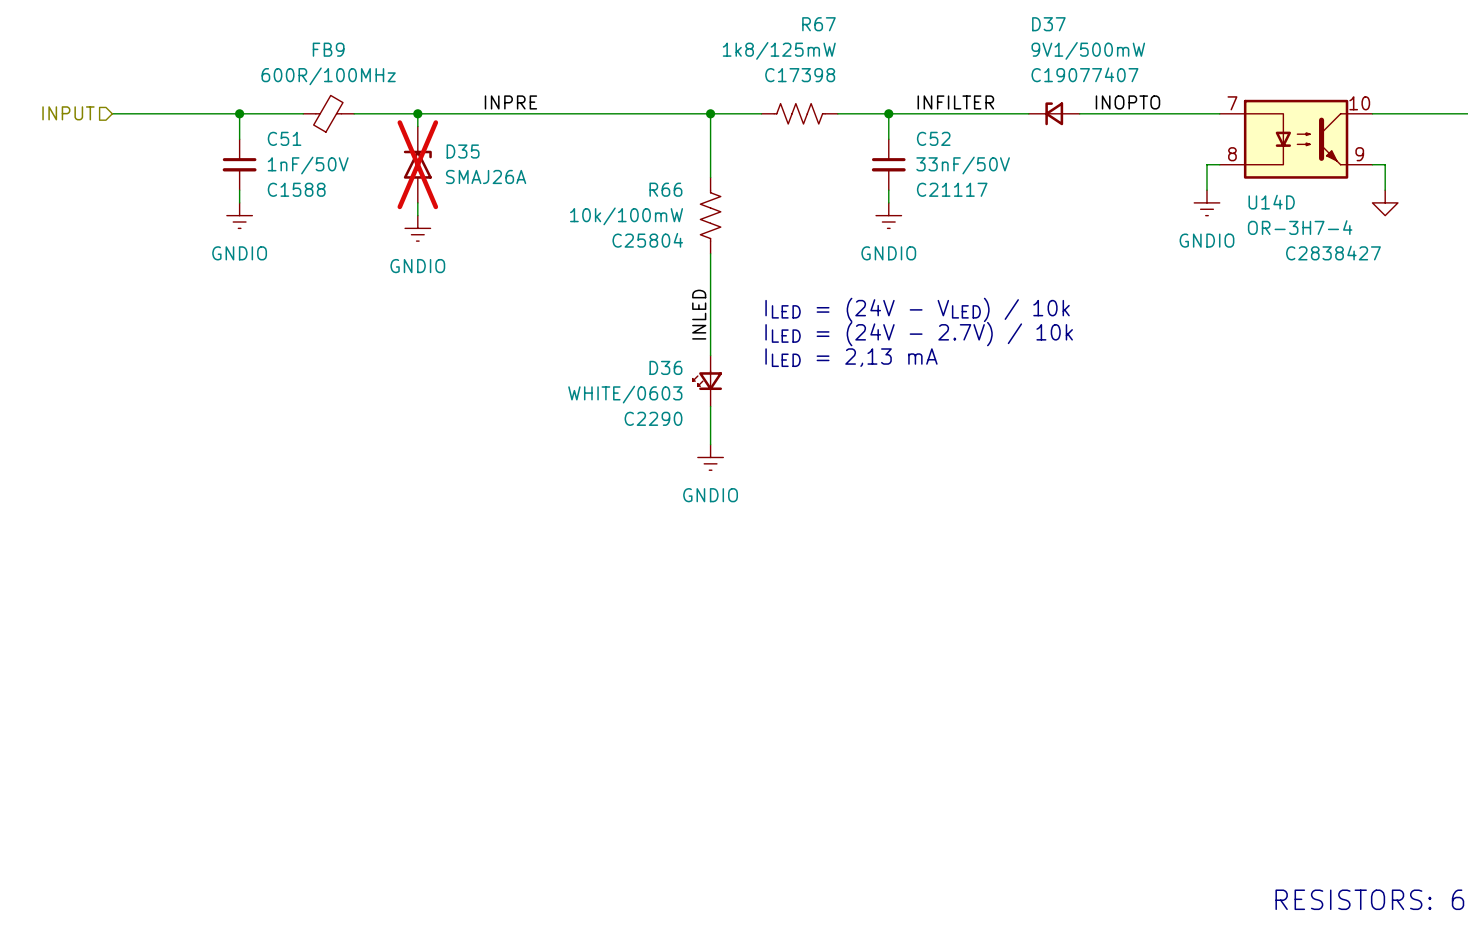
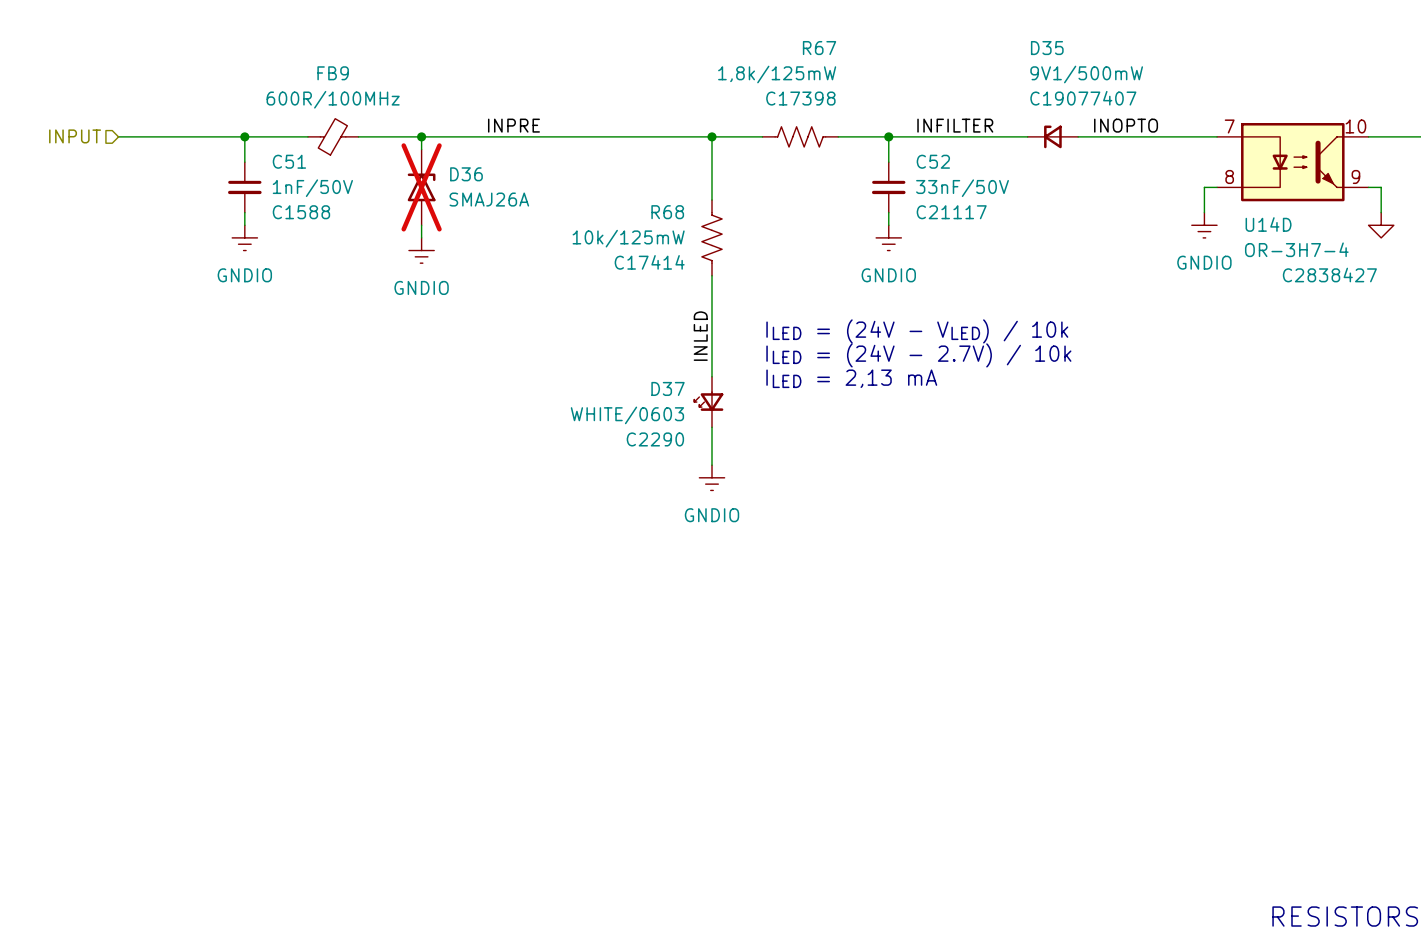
D37 name: D37 (1048, 24) -> D35 (1047, 48)
R67 value: 1k8/125mW (779, 50) -> 1,8k/125mW (777, 74)
D35 name: D35 (463, 151) -> D36 (466, 174)
R66 name: R66 (665, 189) -> R68 (667, 212)
R66 value: 10k/100mW (626, 216) -> 10k/125mW (628, 238)
R66 text: C25804 (647, 240) -> C17414 (649, 262)
D36 name: D36 (665, 367) -> D37 (668, 388)

